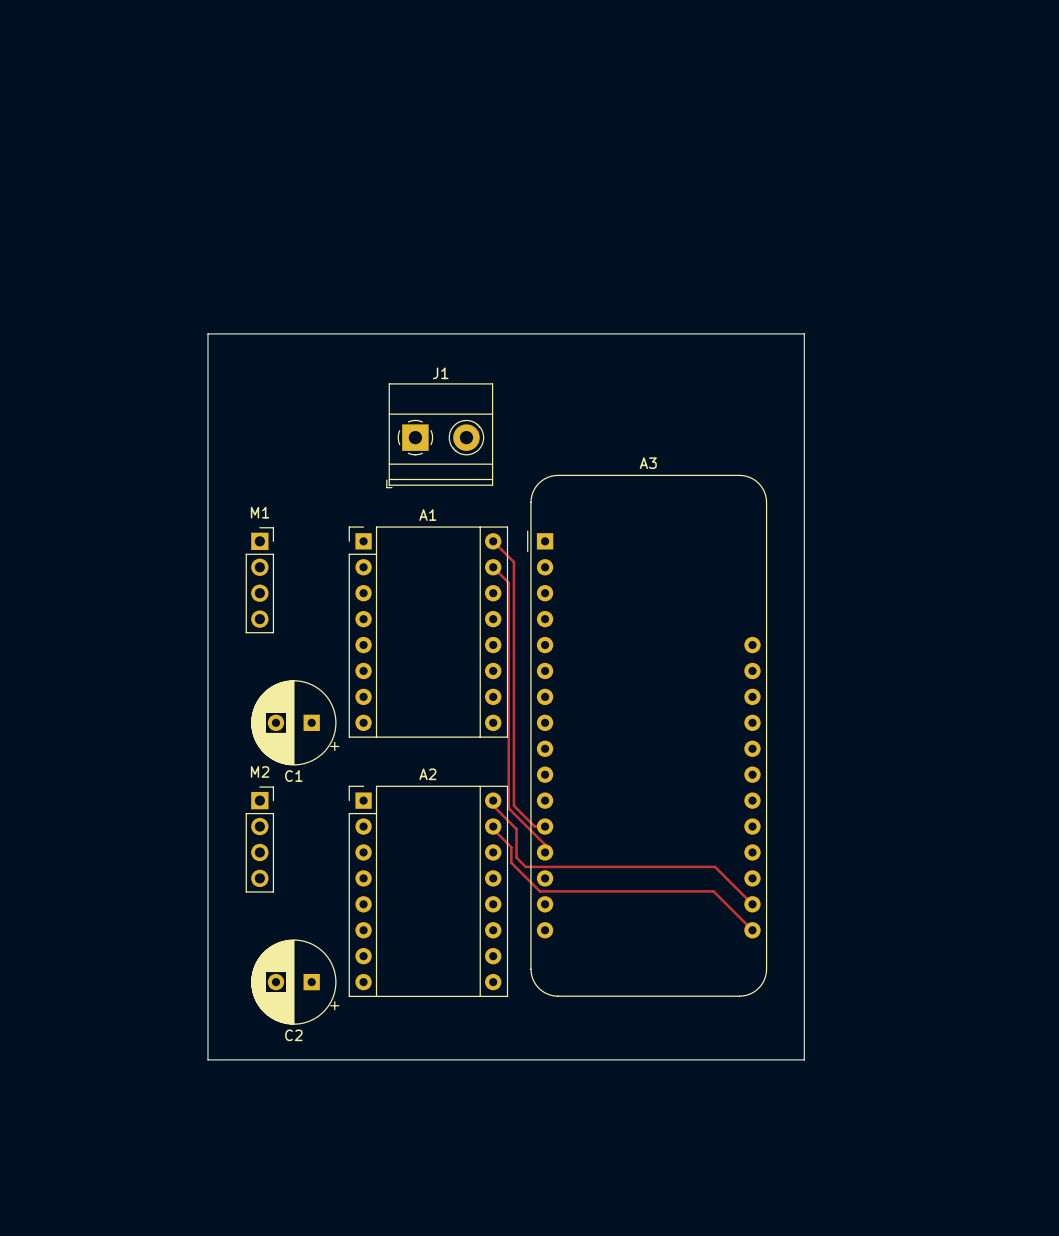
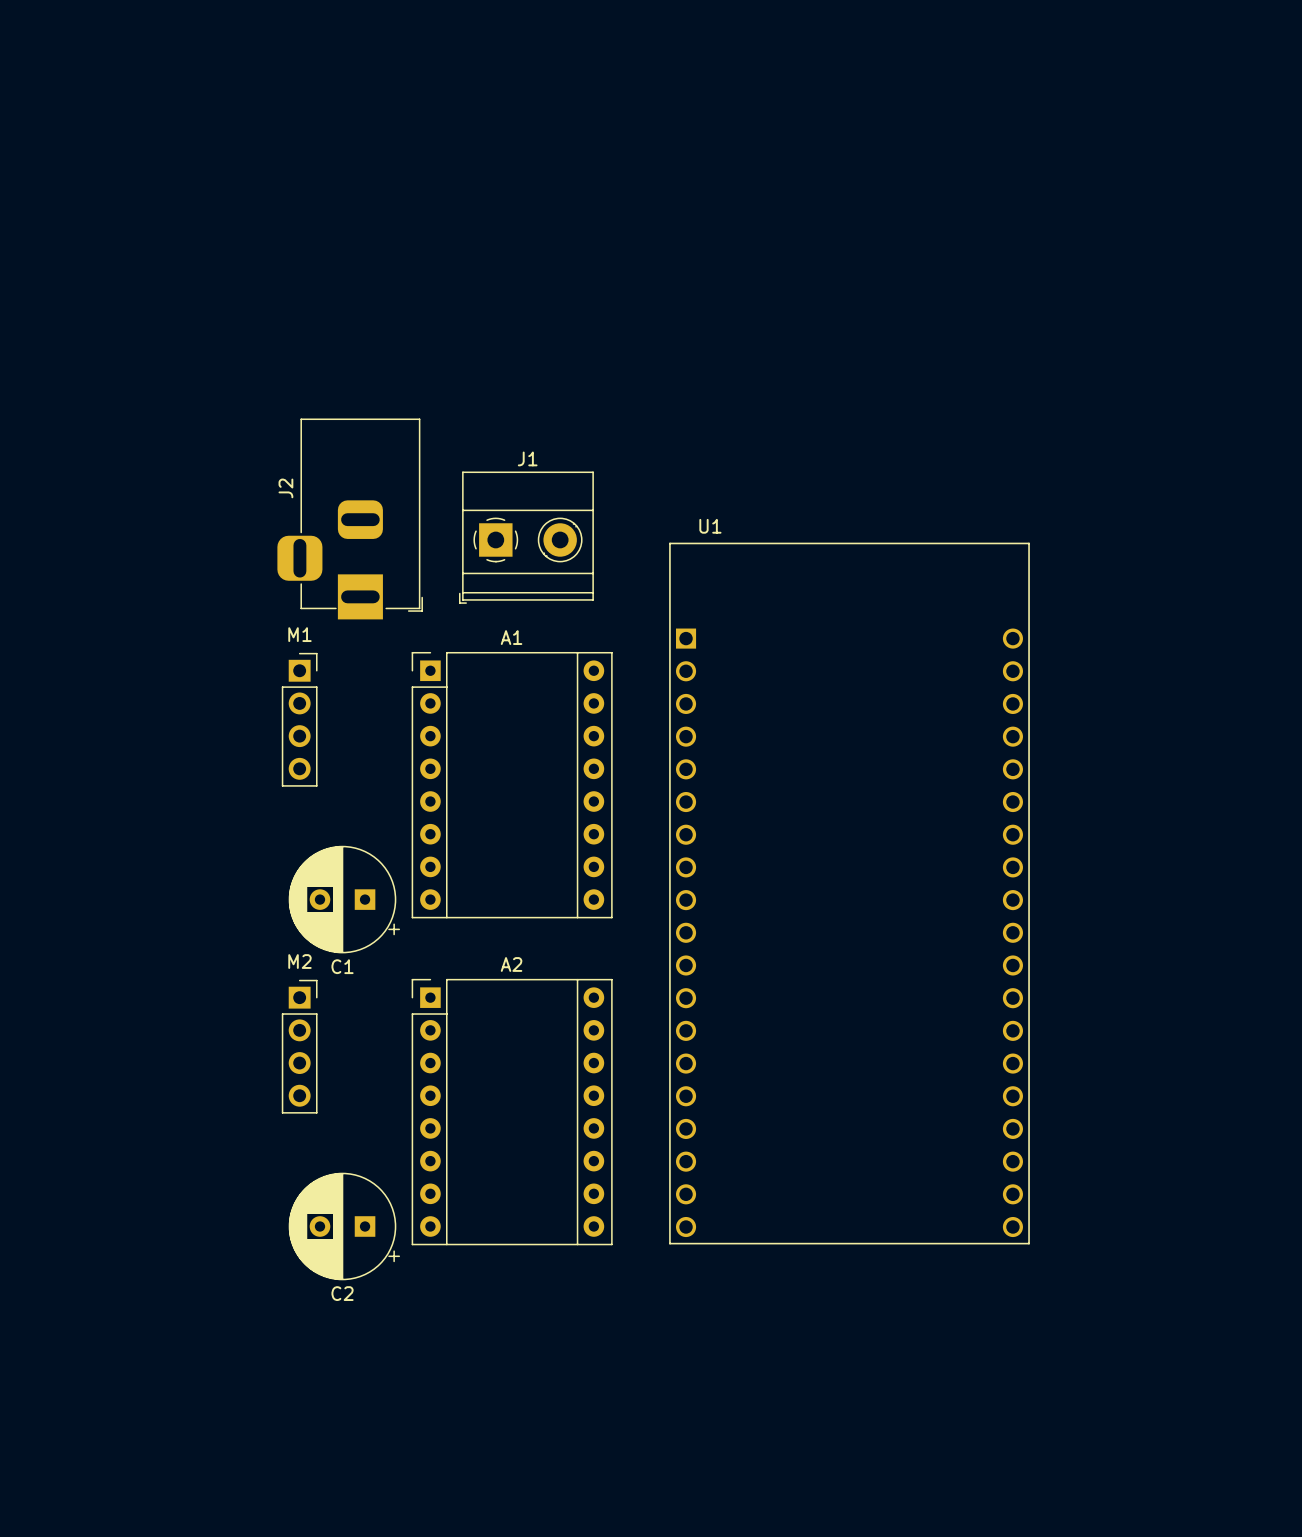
board edge: (207, 333) (804, 333) (804, 1059) (207, 1059) (207, 333) -> none
J2: none -> (350, 518)
track: (493, 541) (513, 562) (513, 805) (534, 826) (545, 826) -> none
track: (493, 567) (508, 582) (508, 808) (545, 844) (545, 852) -> none
U1: none -> (849, 893)
A3: (647, 735) -> none
track: (493, 800) (493, 805) (516, 829) (516, 857) (525, 866) (715, 866) (752, 904) -> none
track: (493, 826) (493, 829) (511, 847) (511, 862) (539, 891) (713, 891) (752, 930) -> none

